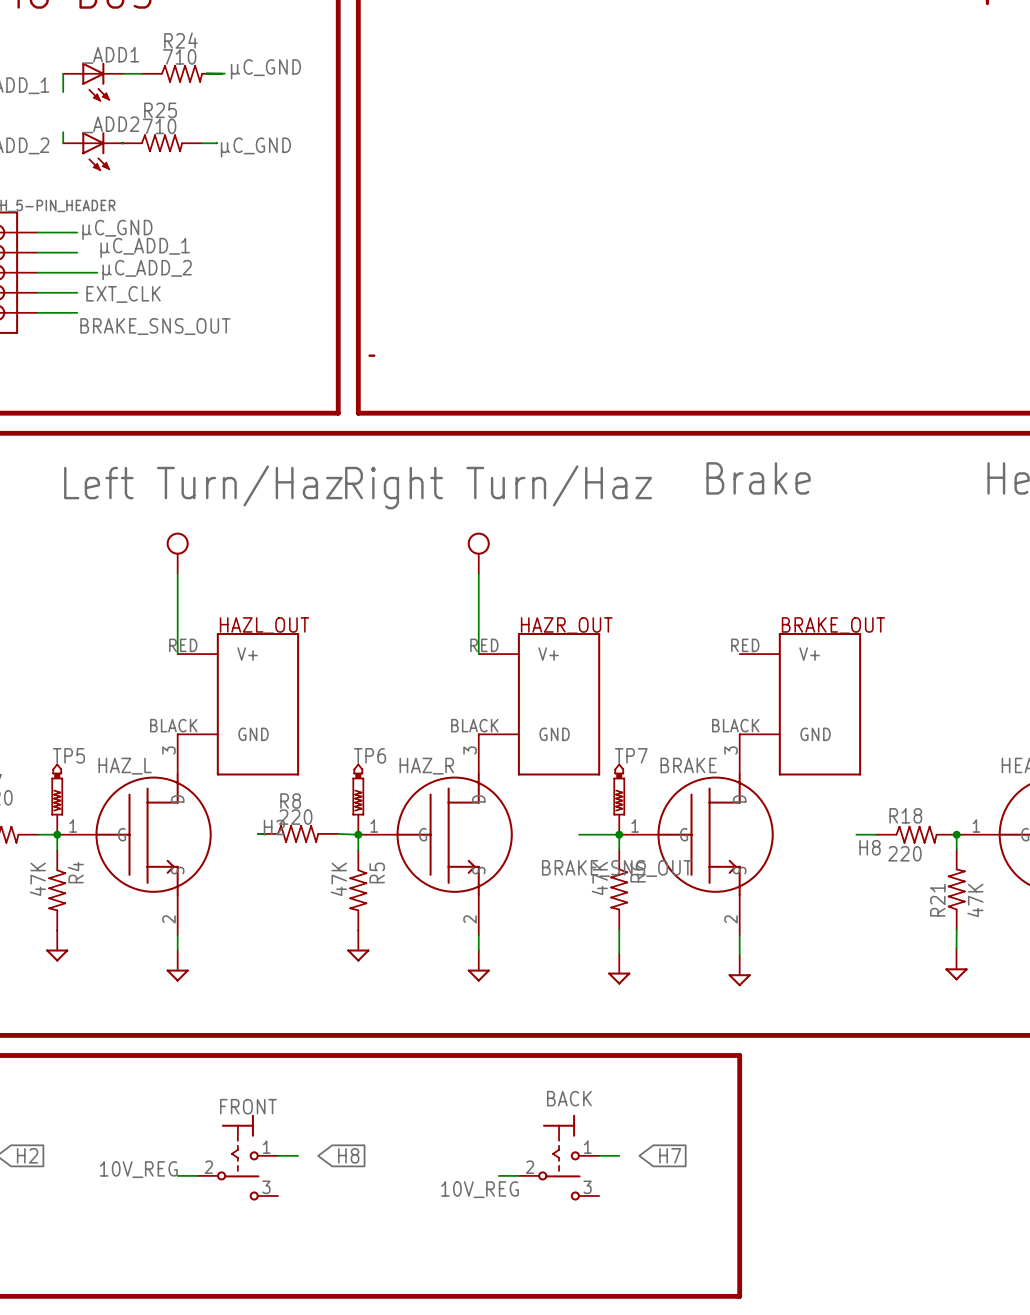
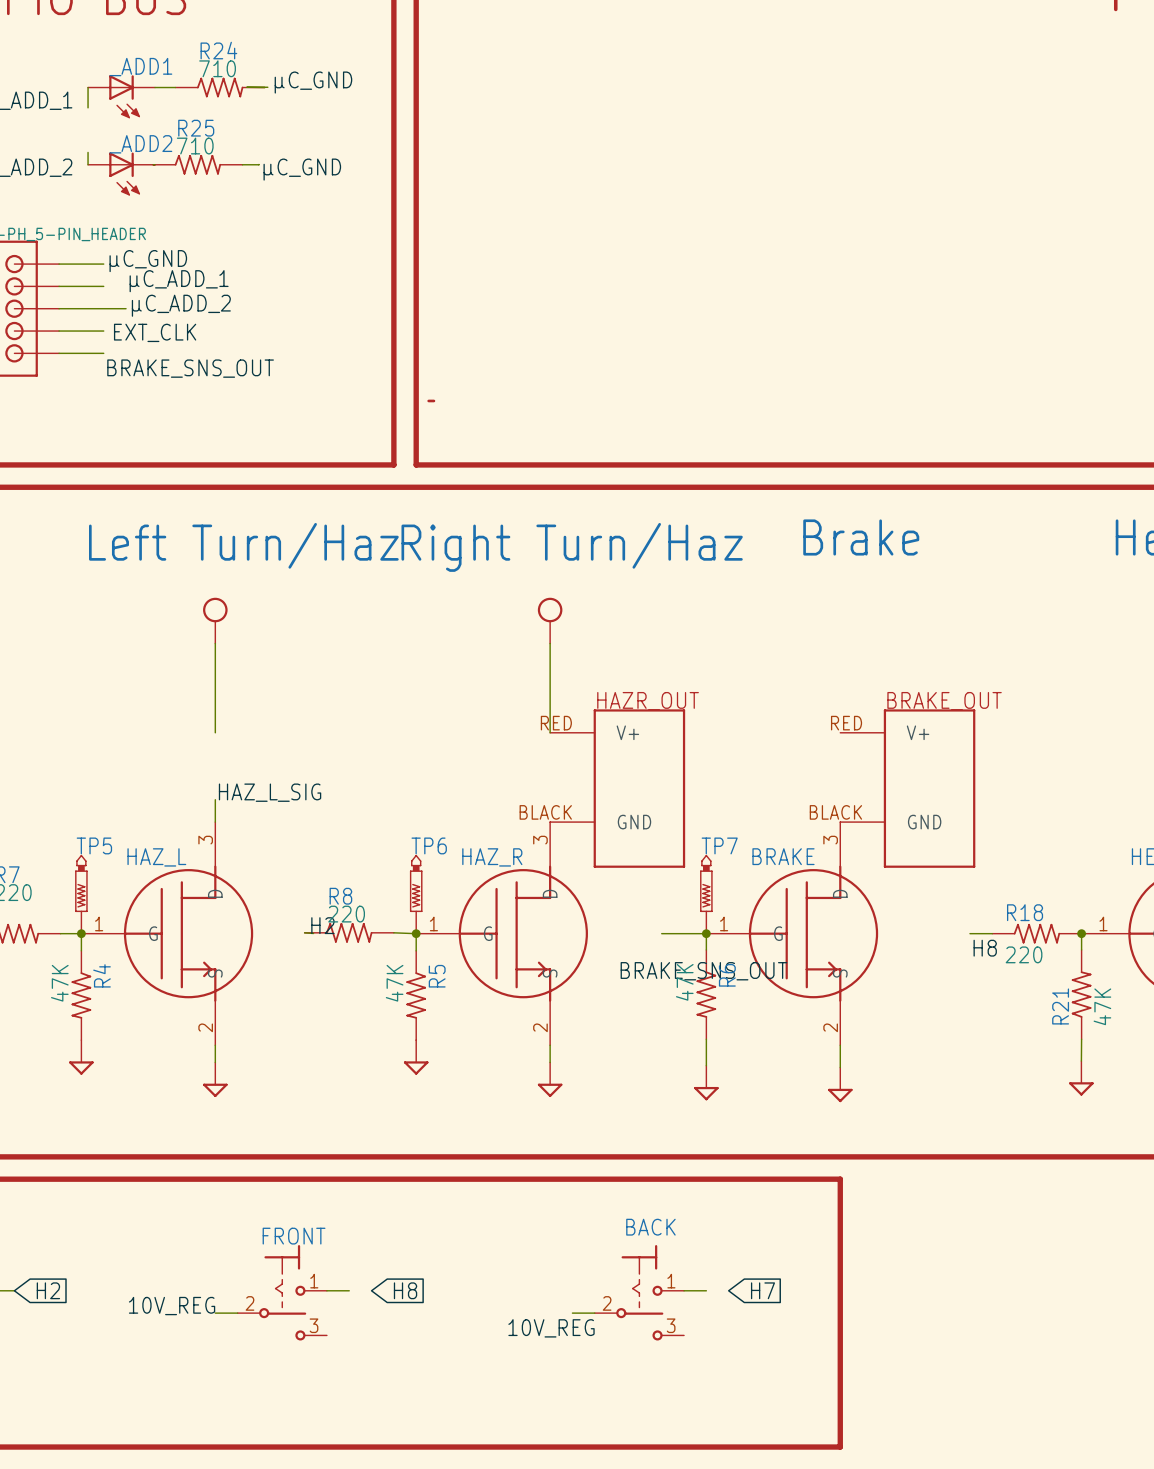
HAZL_OUT: (238, 704) -> none
label: none -> HAZ_L_SIG (270, 792)
wire: none -> (215, 799) (215, 822)

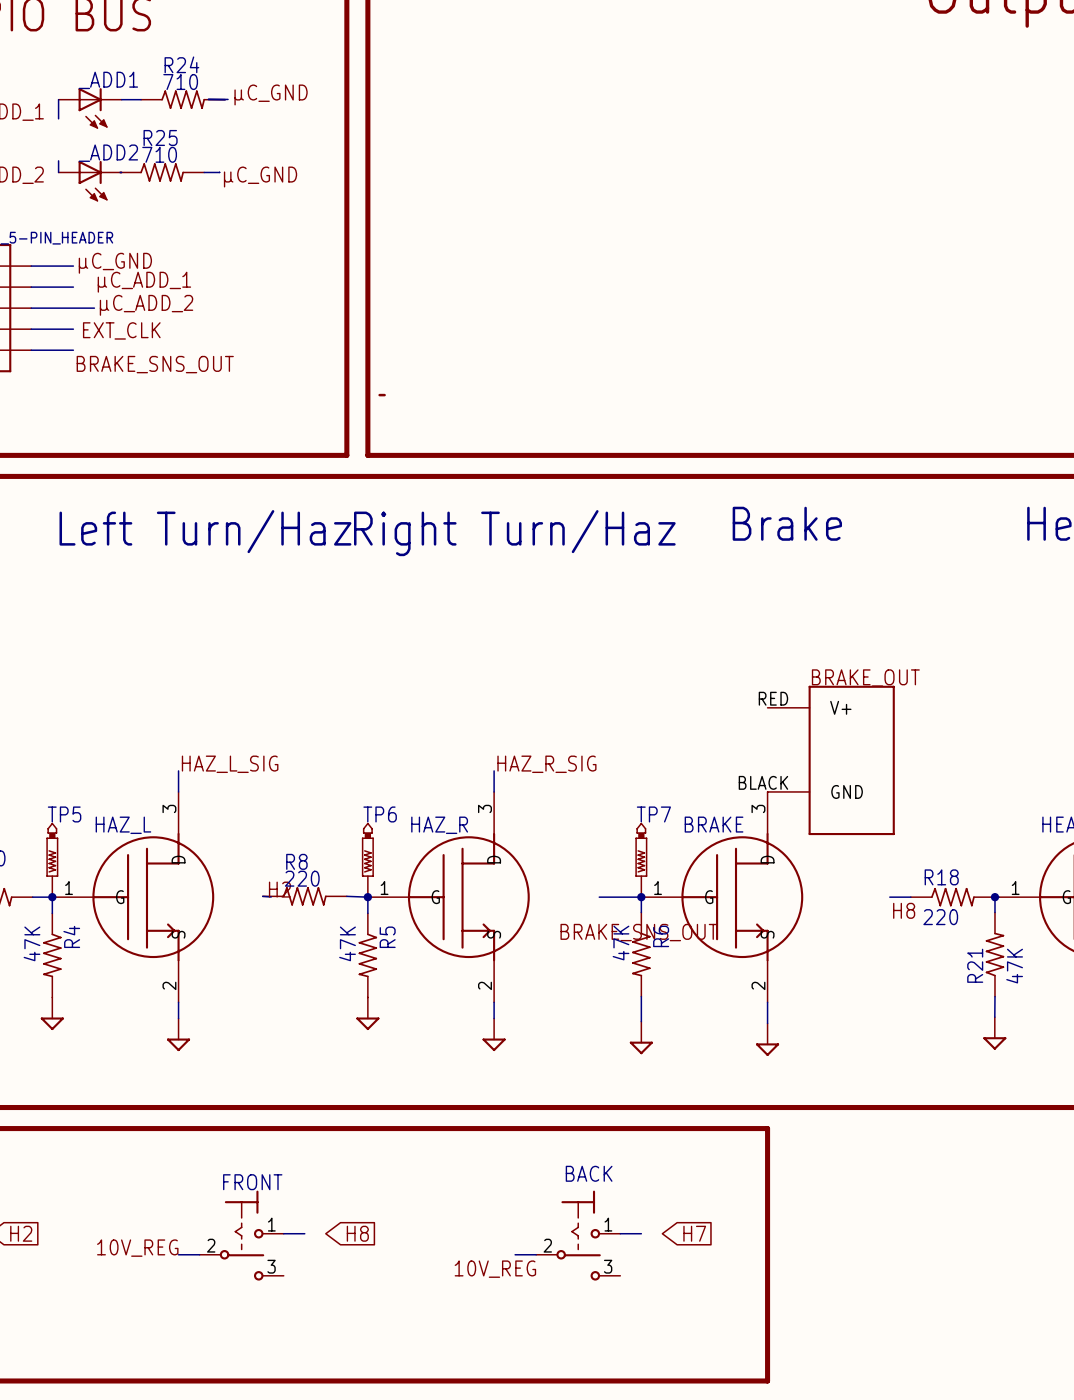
power symbol: (215, 620) -> none
power symbol: (550, 620) -> none
wire: (215, 643) (215, 732) -> none
wire: (550, 643) (550, 732) -> none
HAZR_OUT: (617, 788) -> none
label: none -> HAZ_R_SIG (546, 764)
wire: none -> (494, 770) (494, 791)

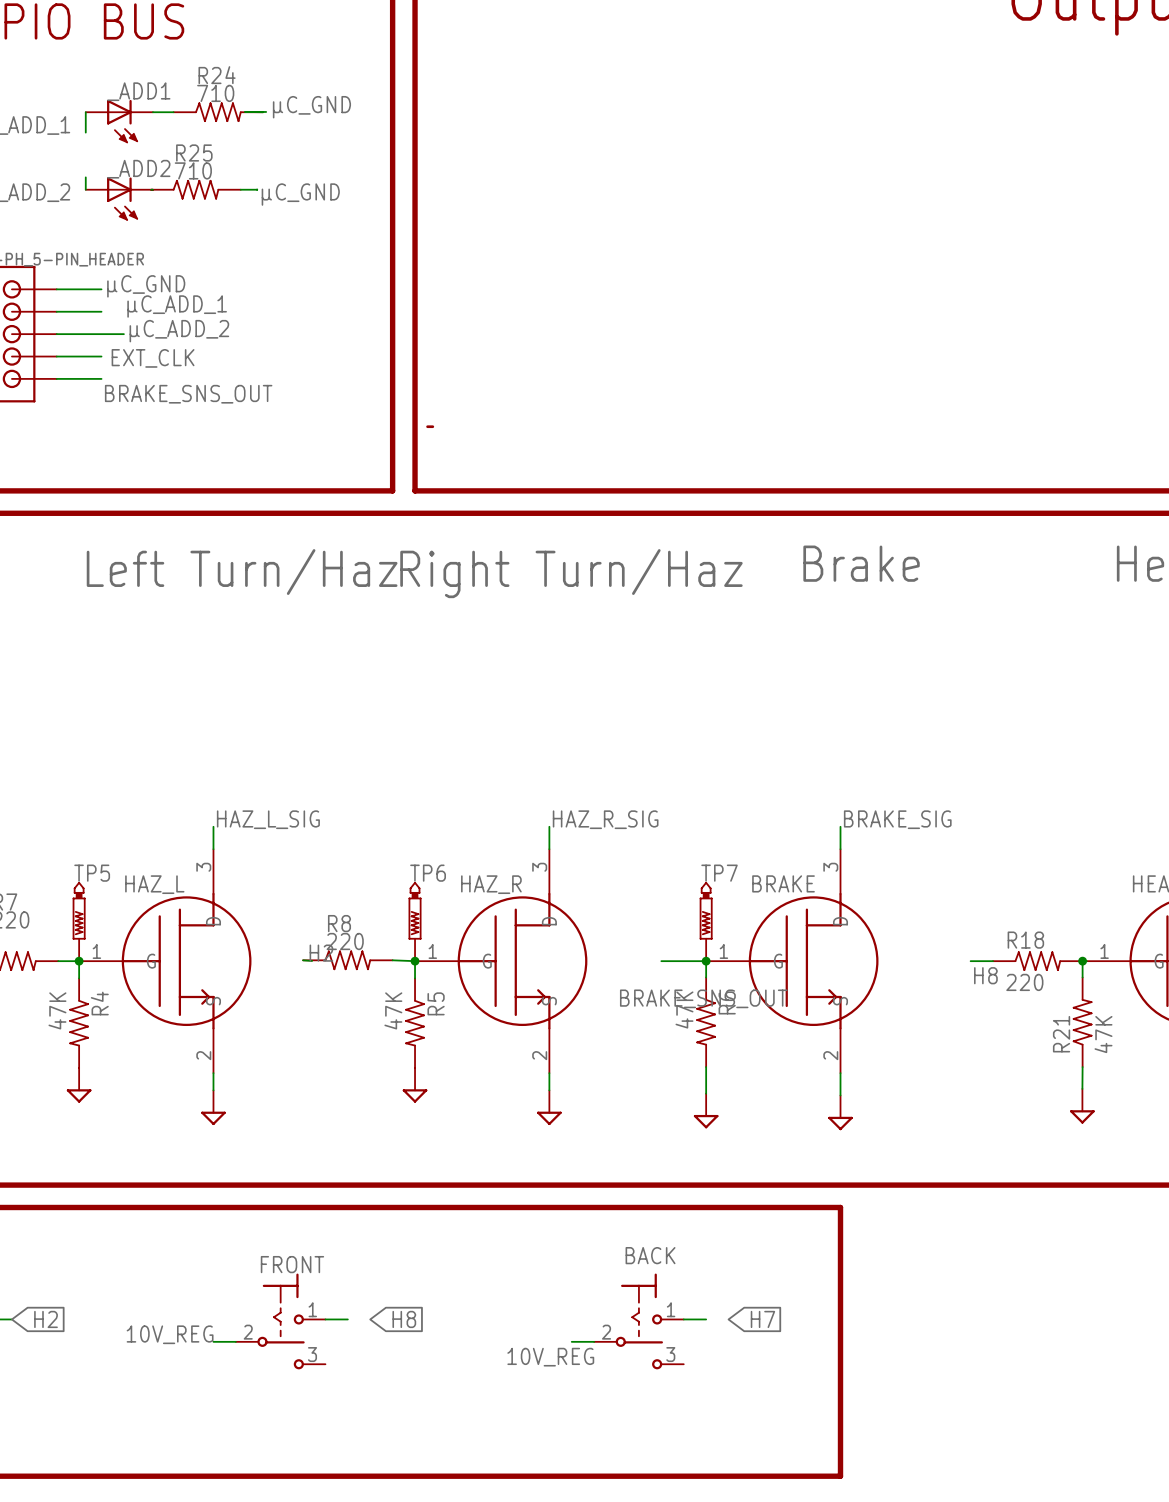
BRAKE_OUT: (831, 760) -> none
label: none -> BRAKE_SIG (897, 819)
wire: none -> (840, 826) (840, 849)

